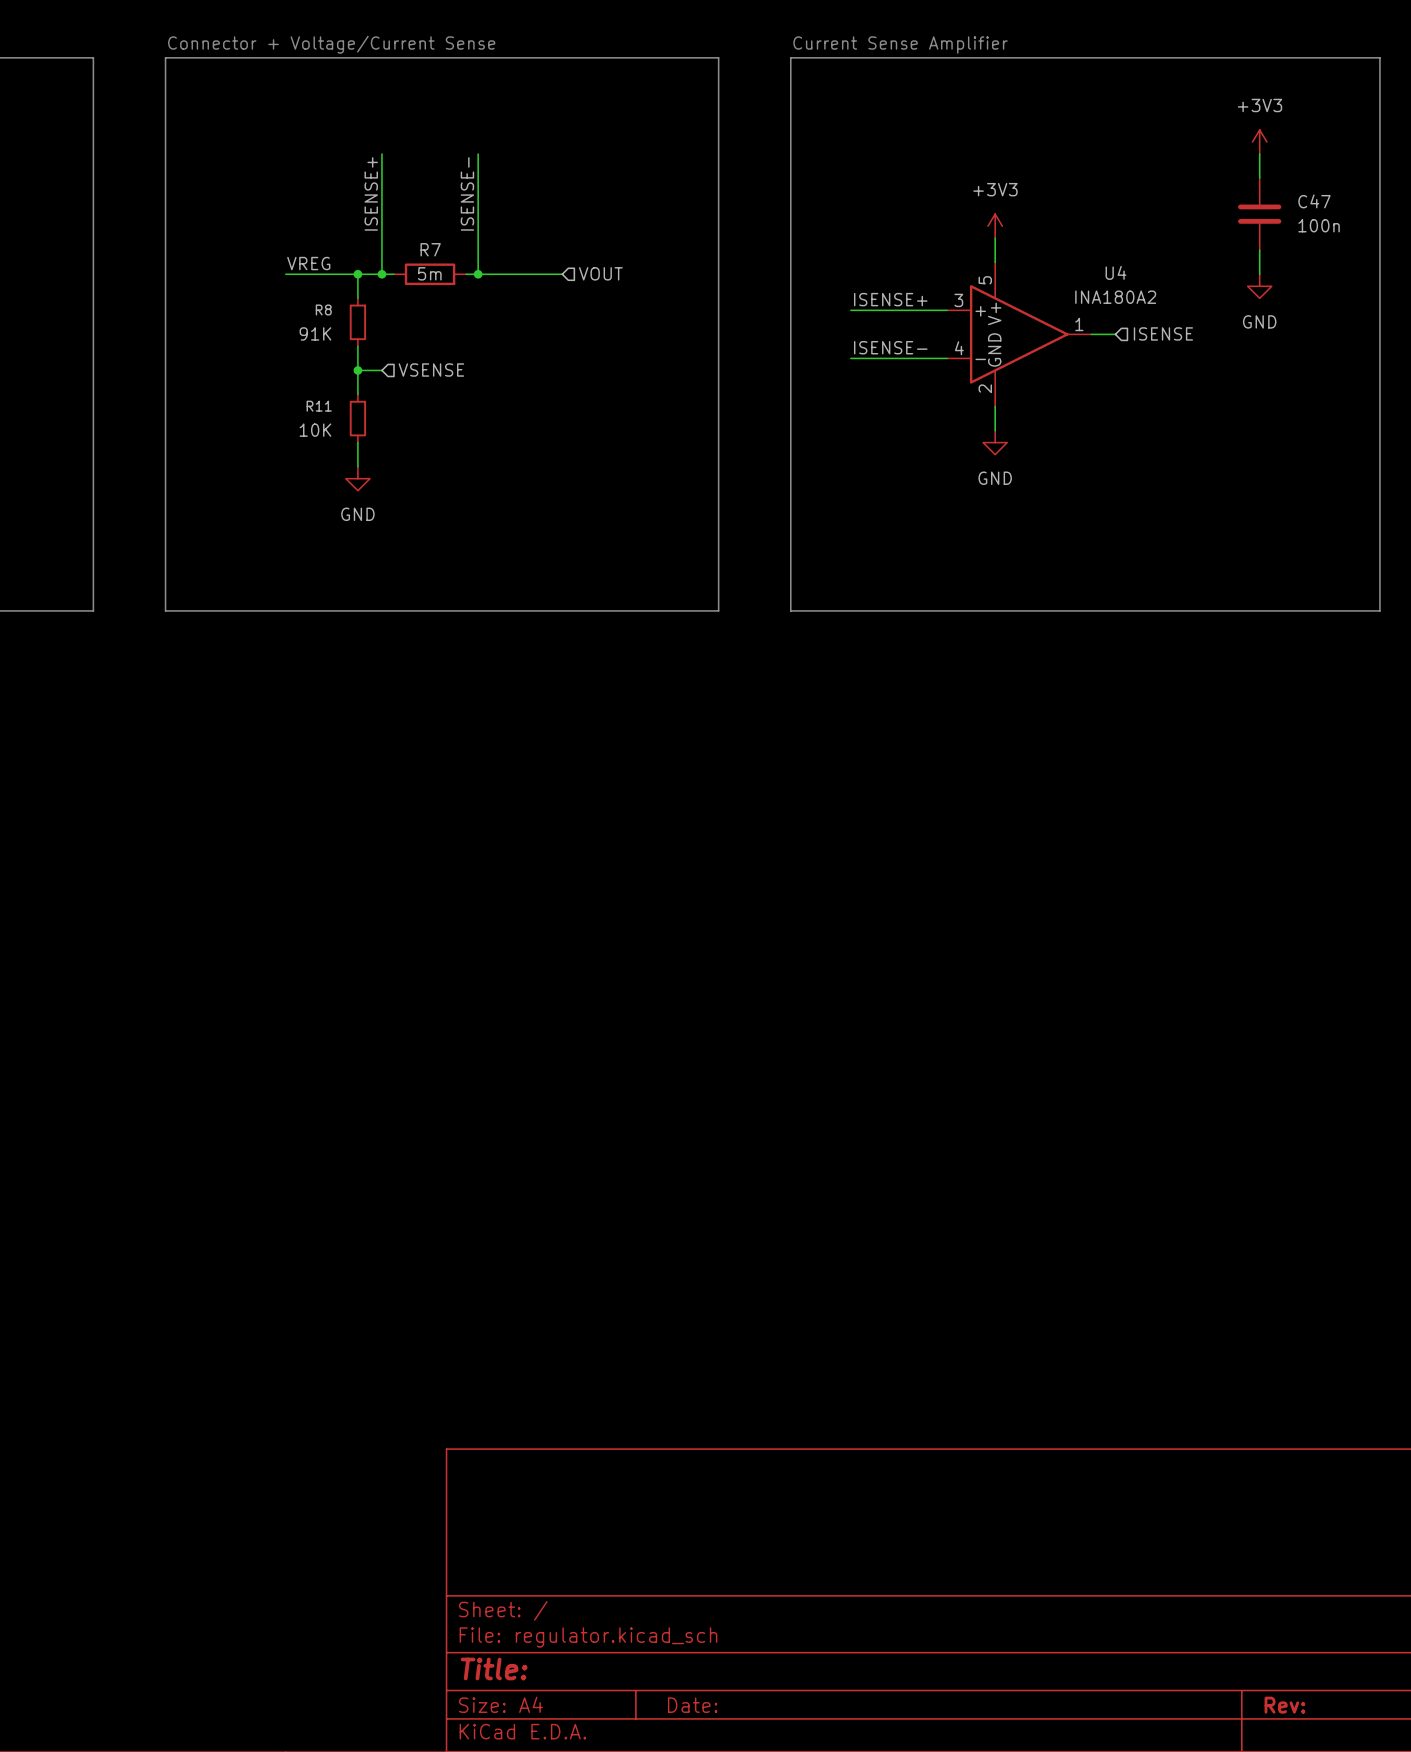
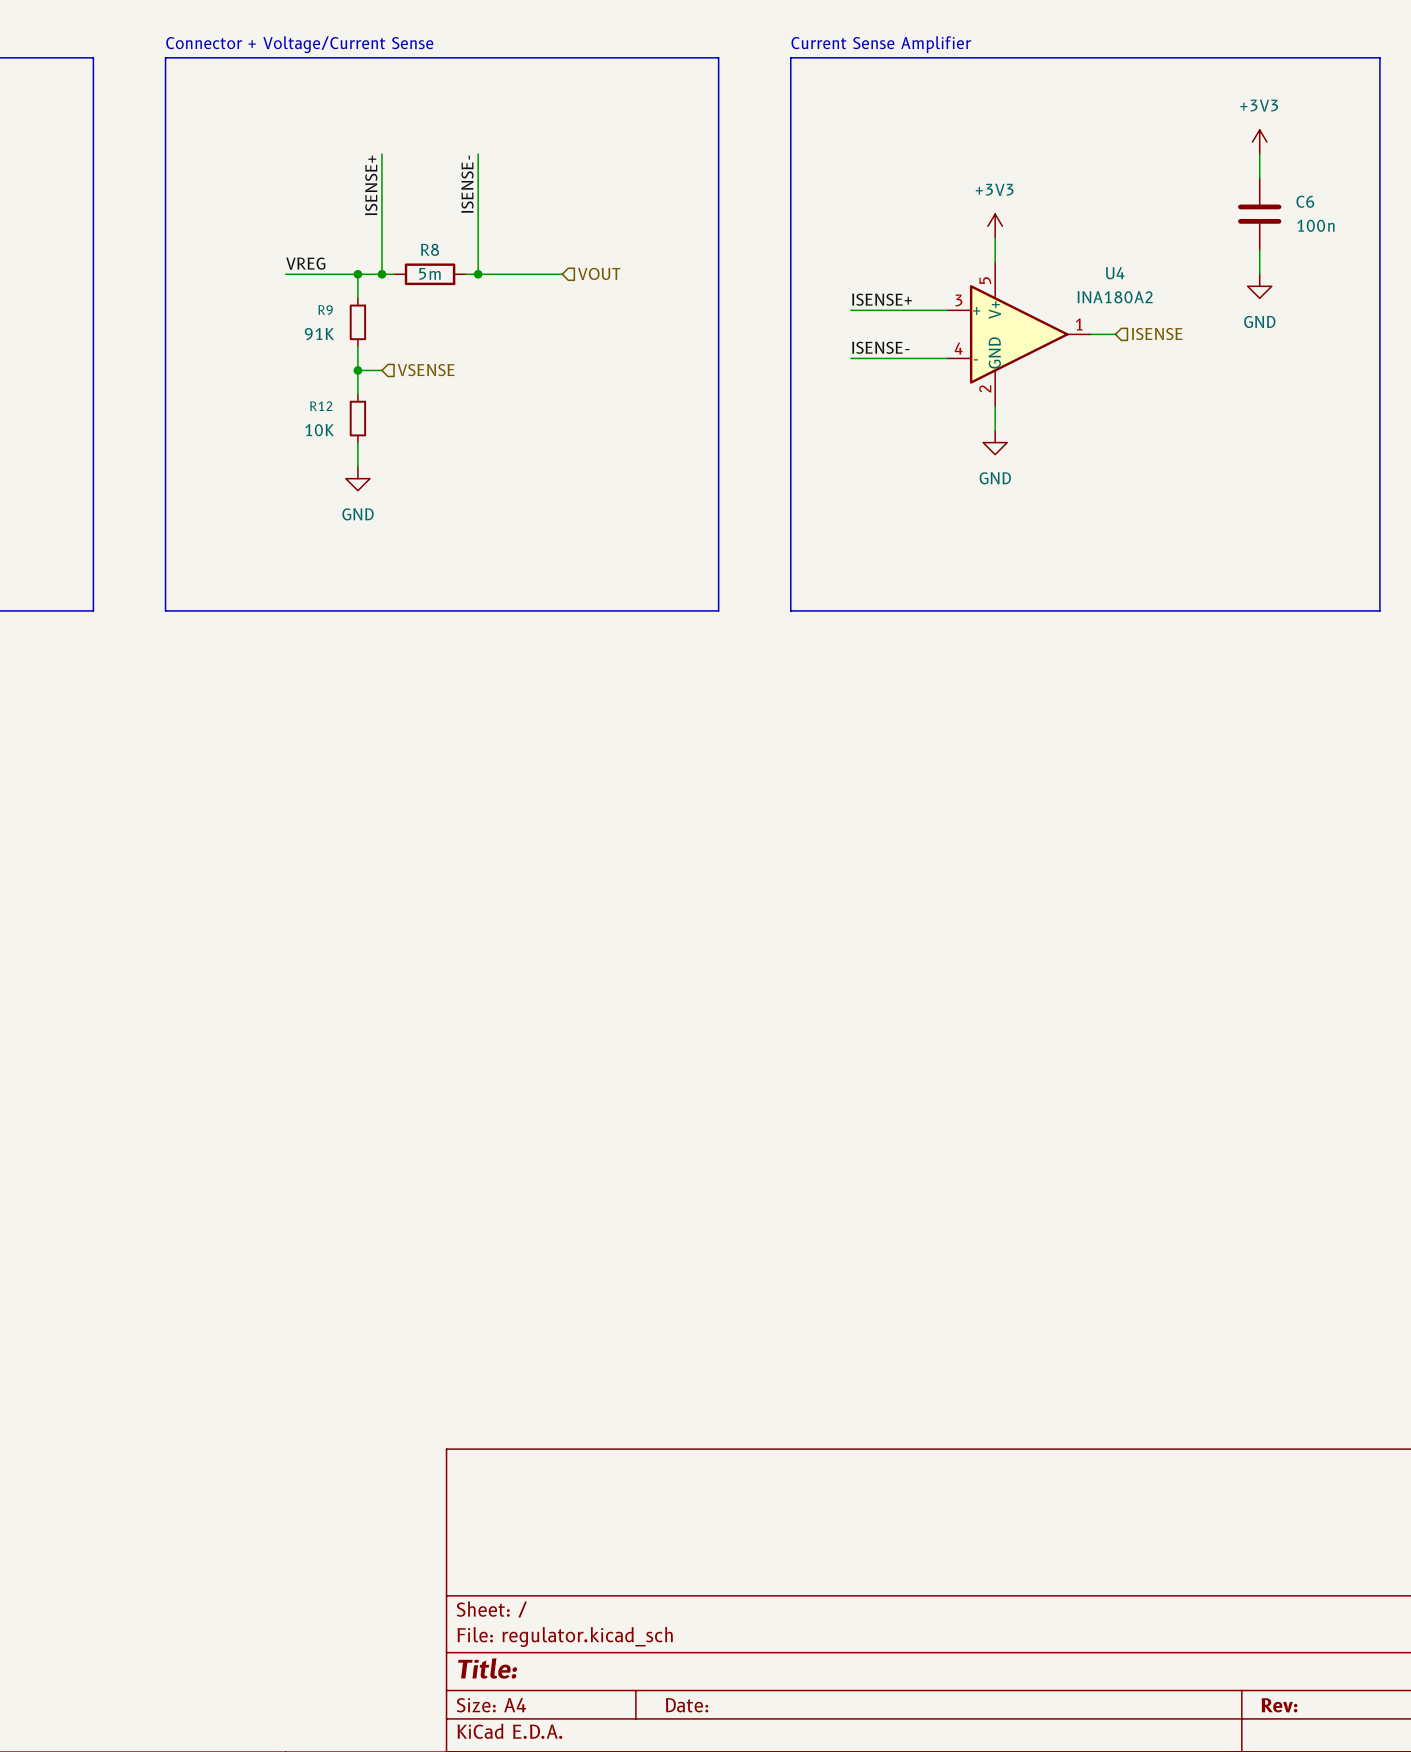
C47 name: C47 (1314, 201) -> C6 (1305, 201)
R7 name: R7 (430, 249) -> R8 (430, 249)
R8 name: R8 (323, 309) -> R9 (325, 310)
R11 name: R11 (319, 406) -> R12 (321, 406)

